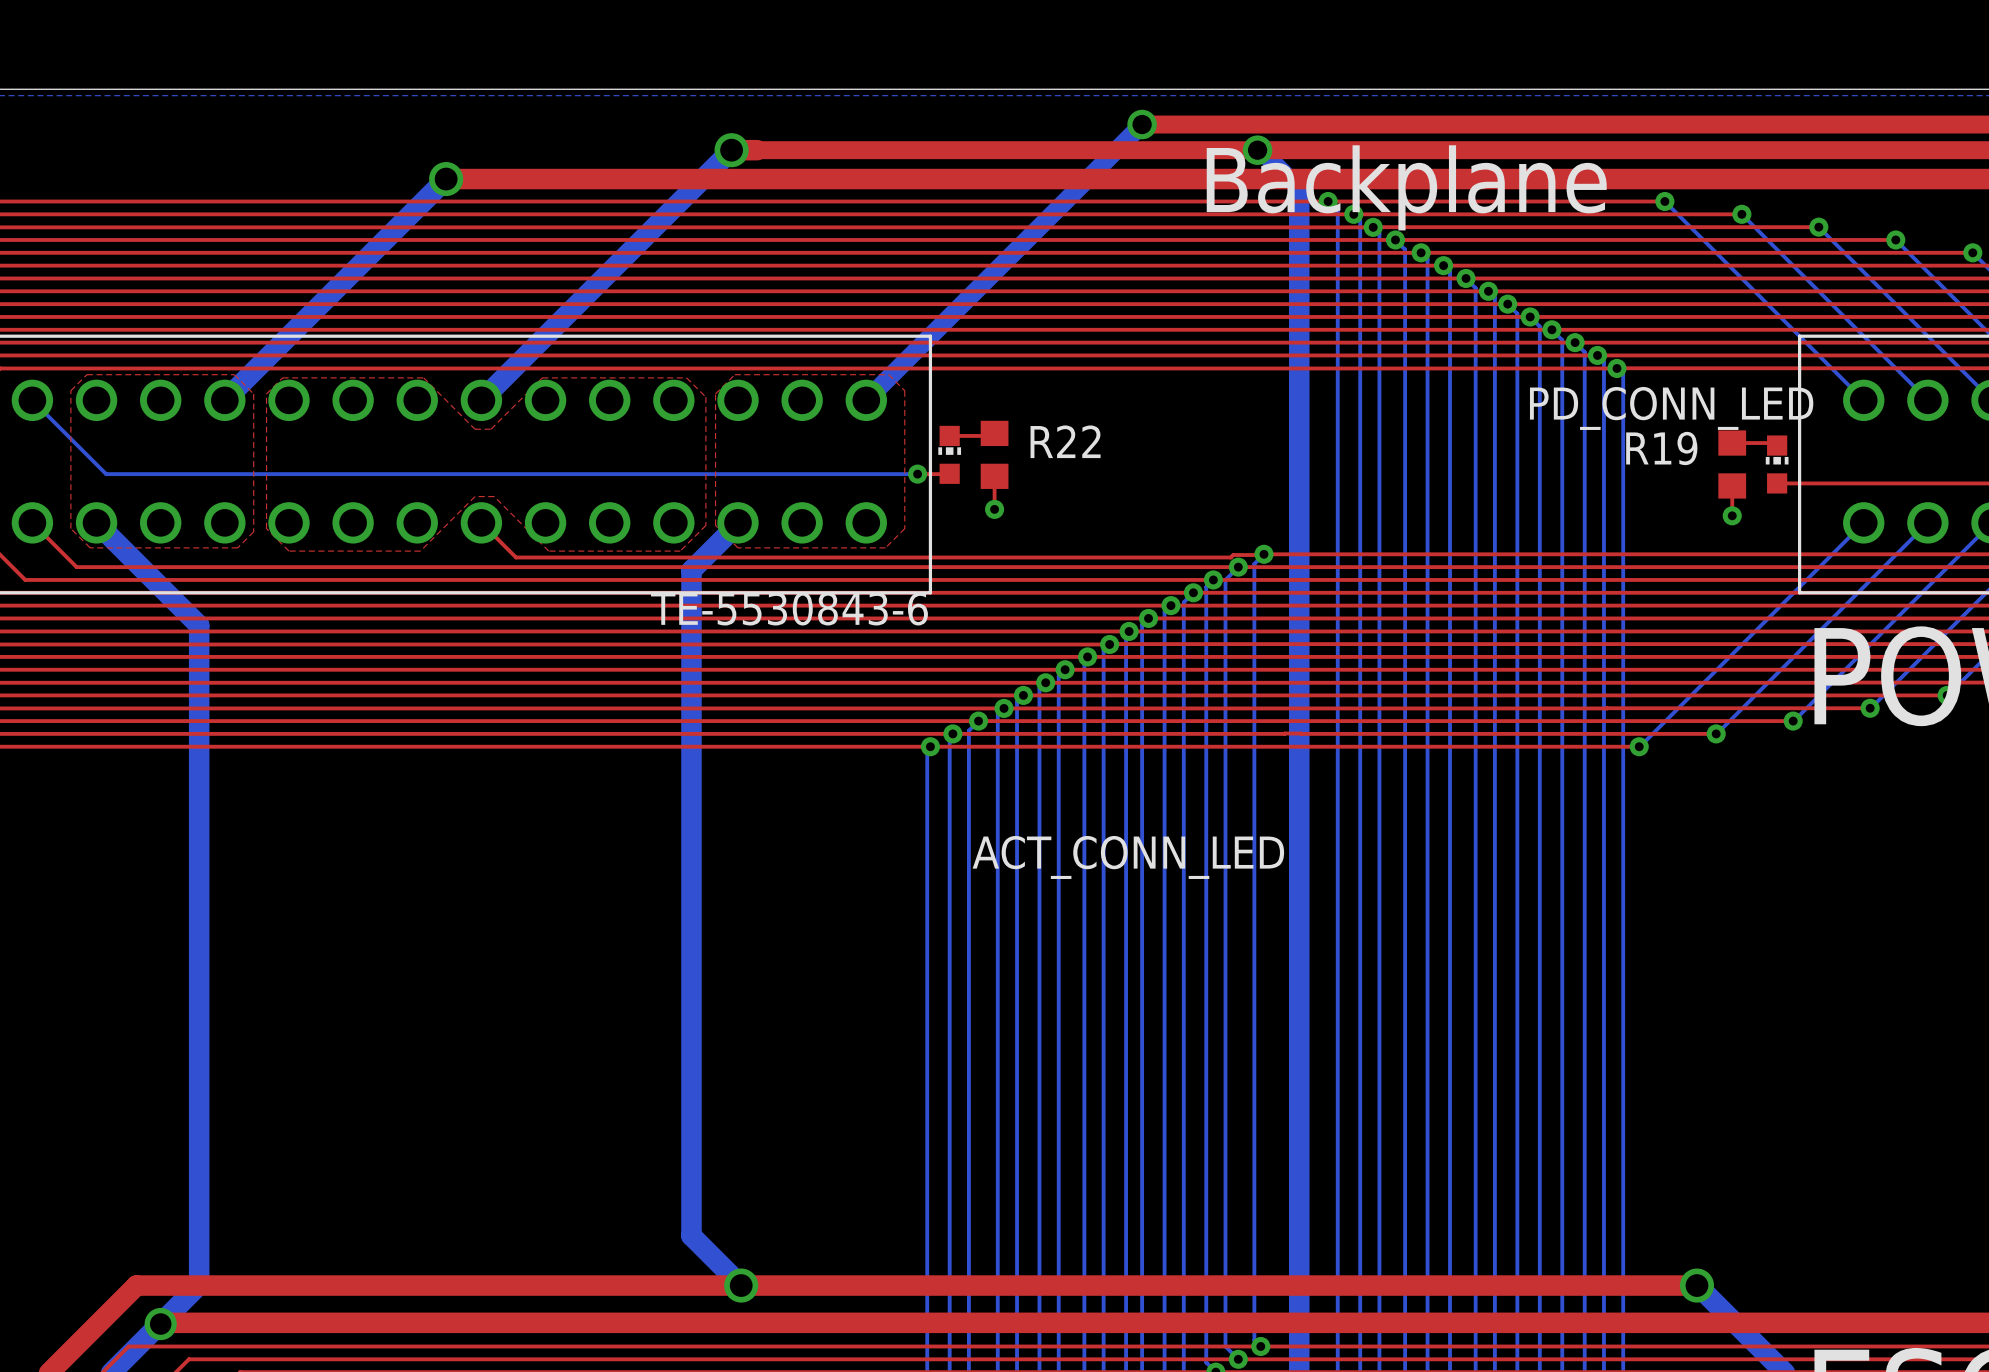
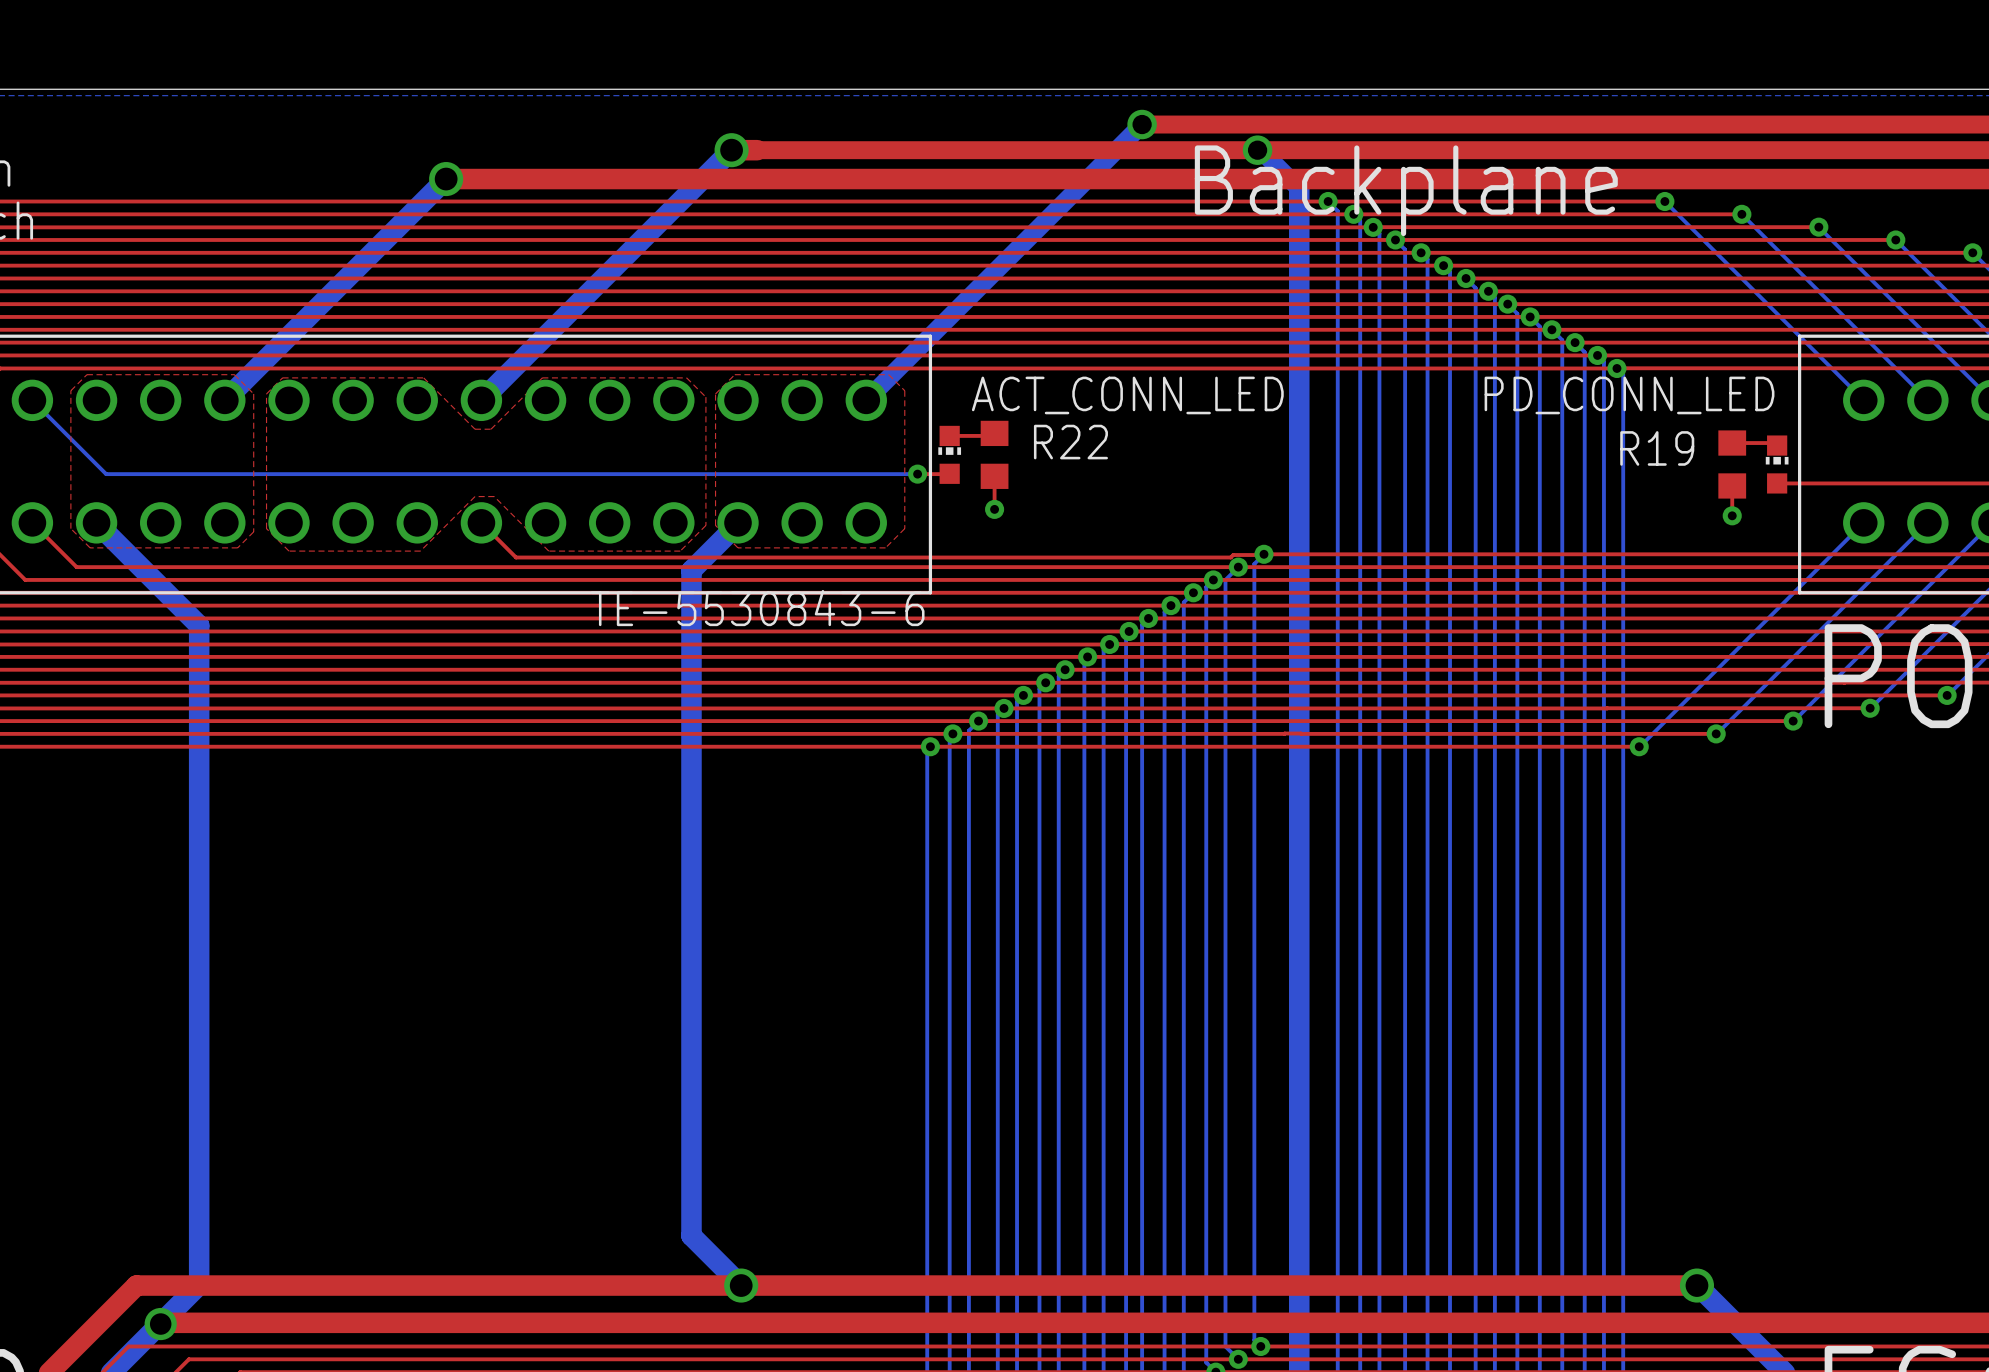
PD_CONN_LED name position: PD_CONN_LED (1671, 408) -> PD_CONN_LED (1629, 395)
ACT_CONN_LED name position: ACT_CONN_LED (1128, 857) -> ACT_CONN_LED (1127, 395)

